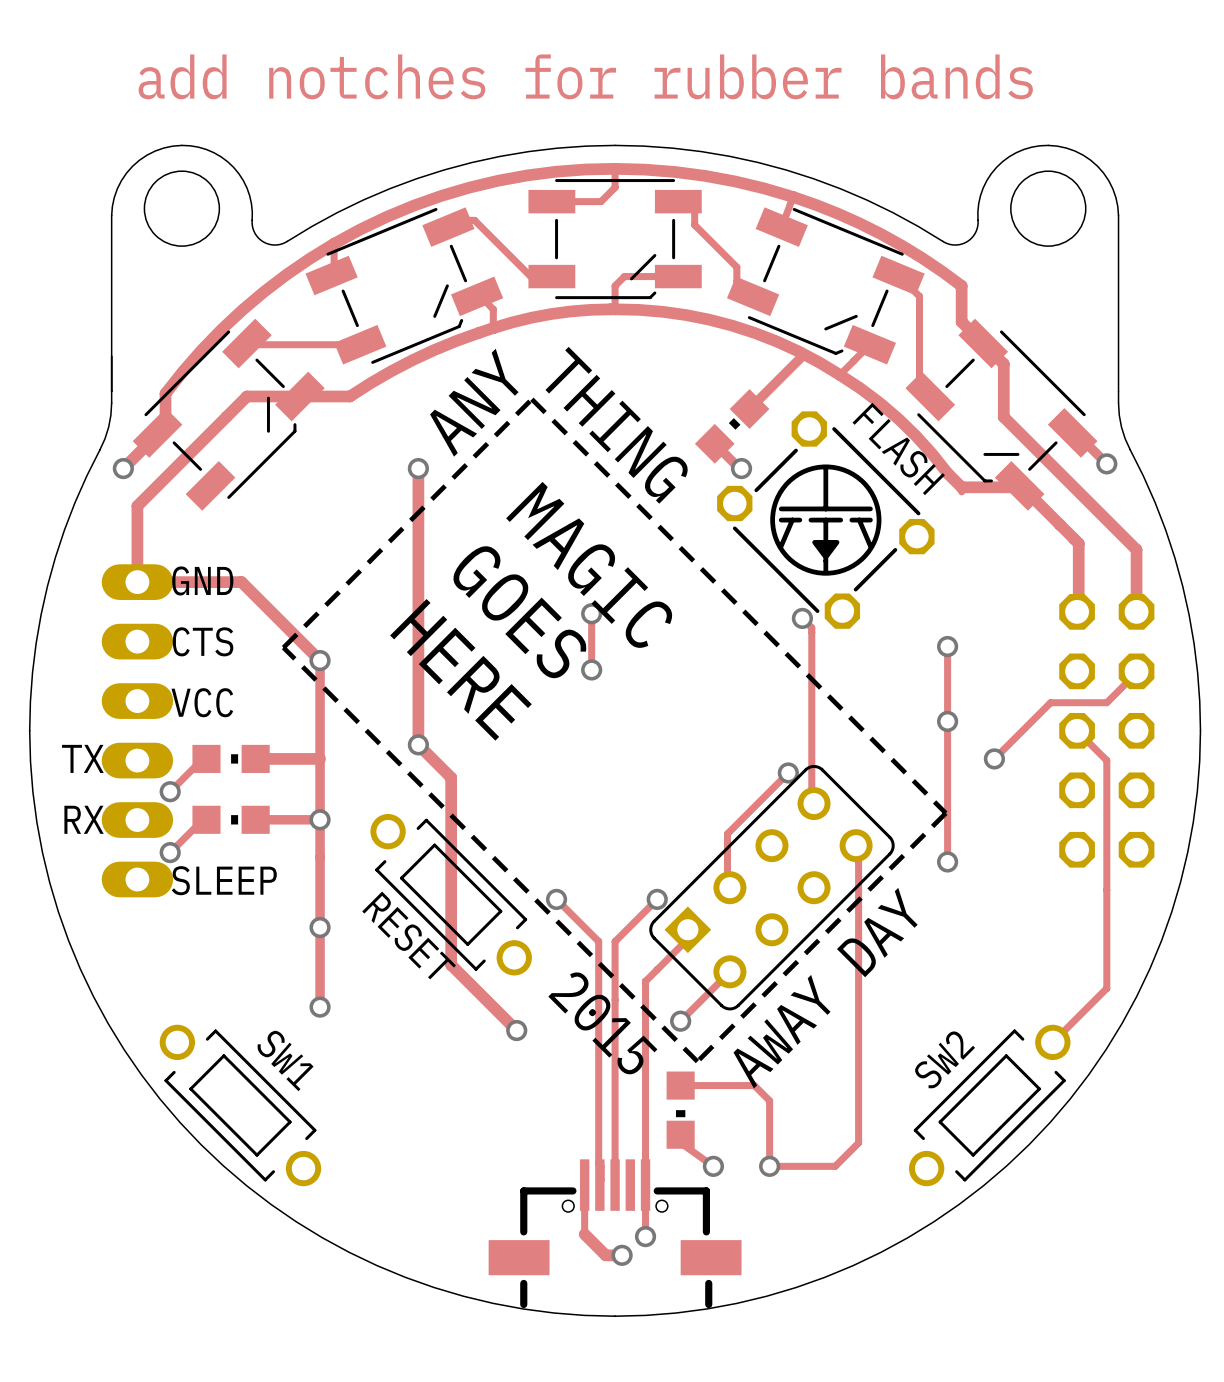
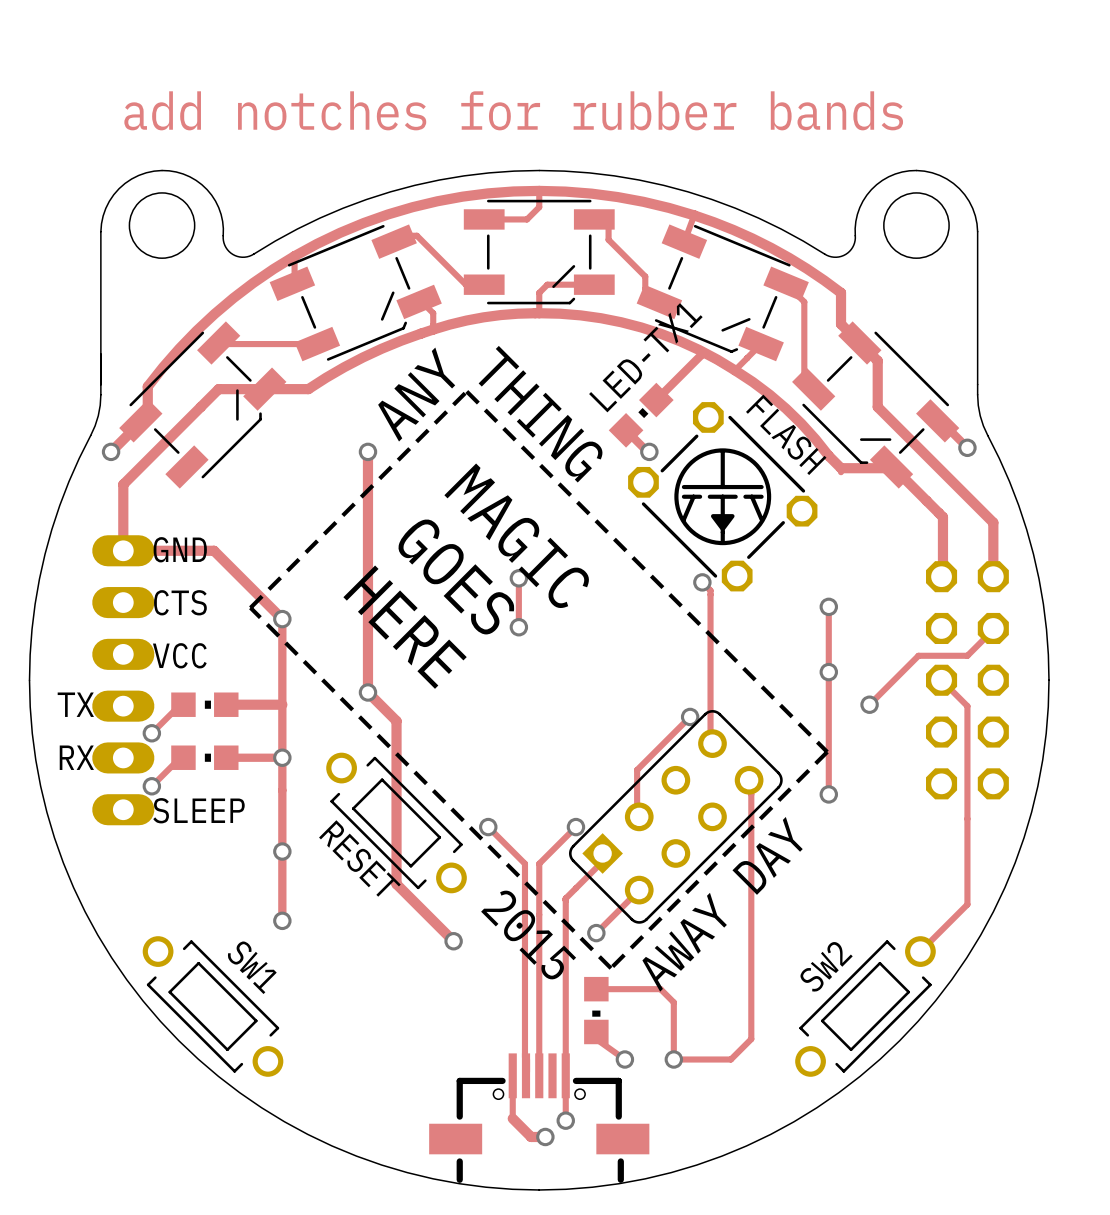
LED-TX1 name: none -> LED-TX1 (645, 357)

